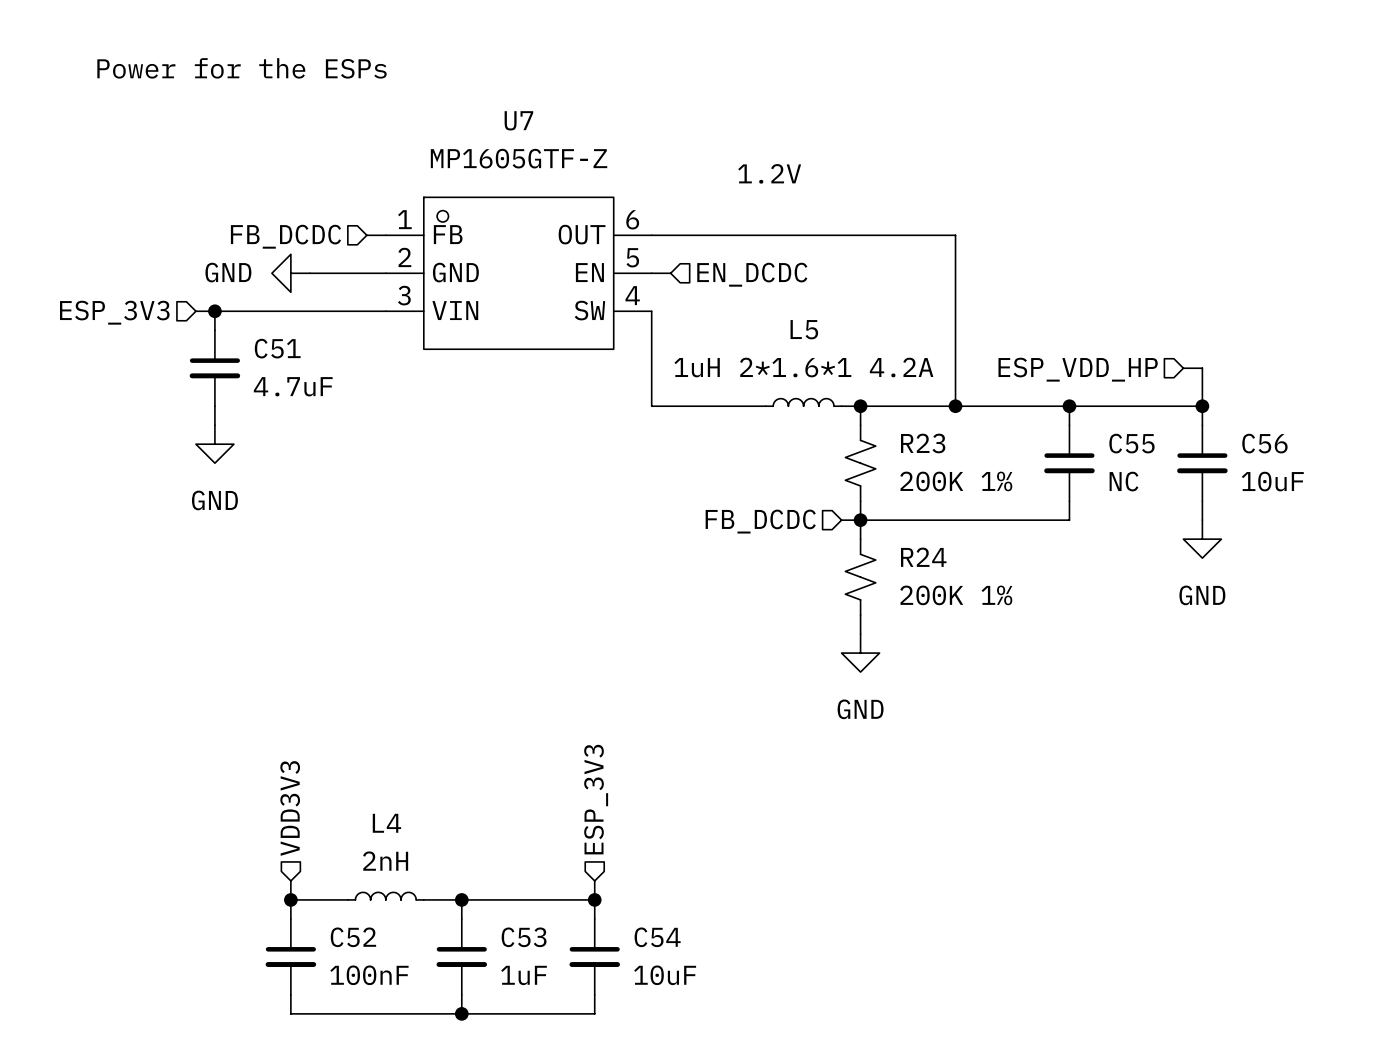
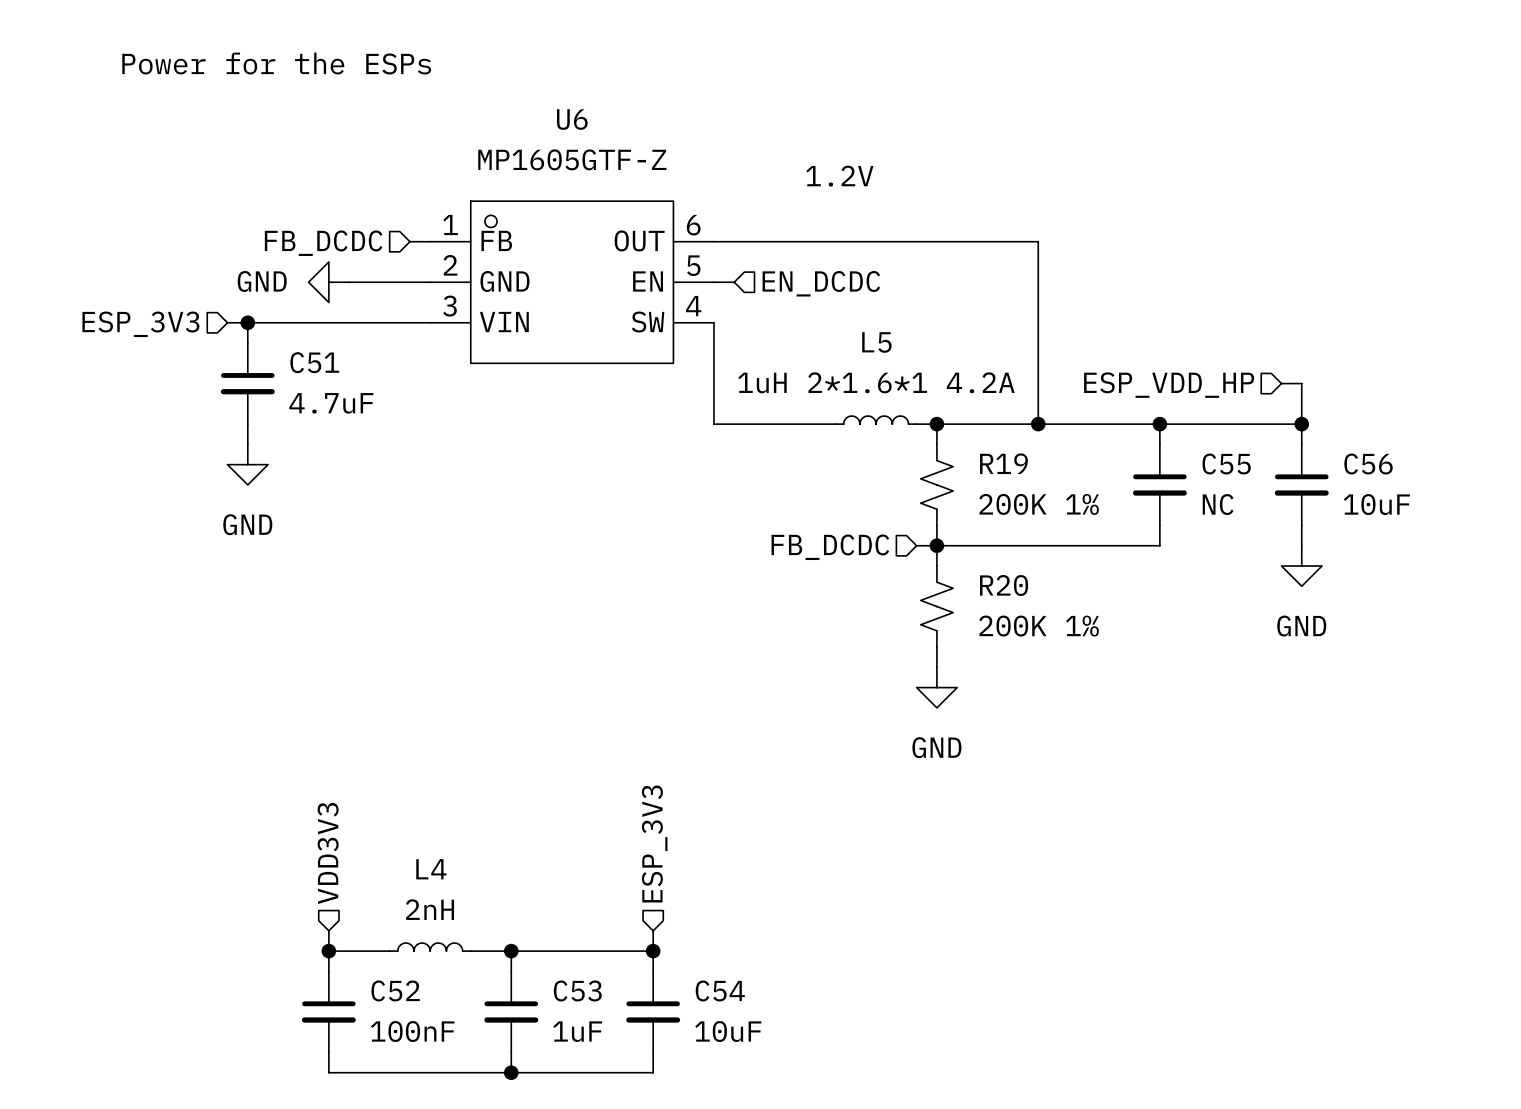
U7 name: U7 (518, 120) -> U6 (572, 119)
R23 name: R23 (923, 443) -> R19 (1003, 463)
R24 name: R24 (923, 557) -> R20 (1004, 585)

